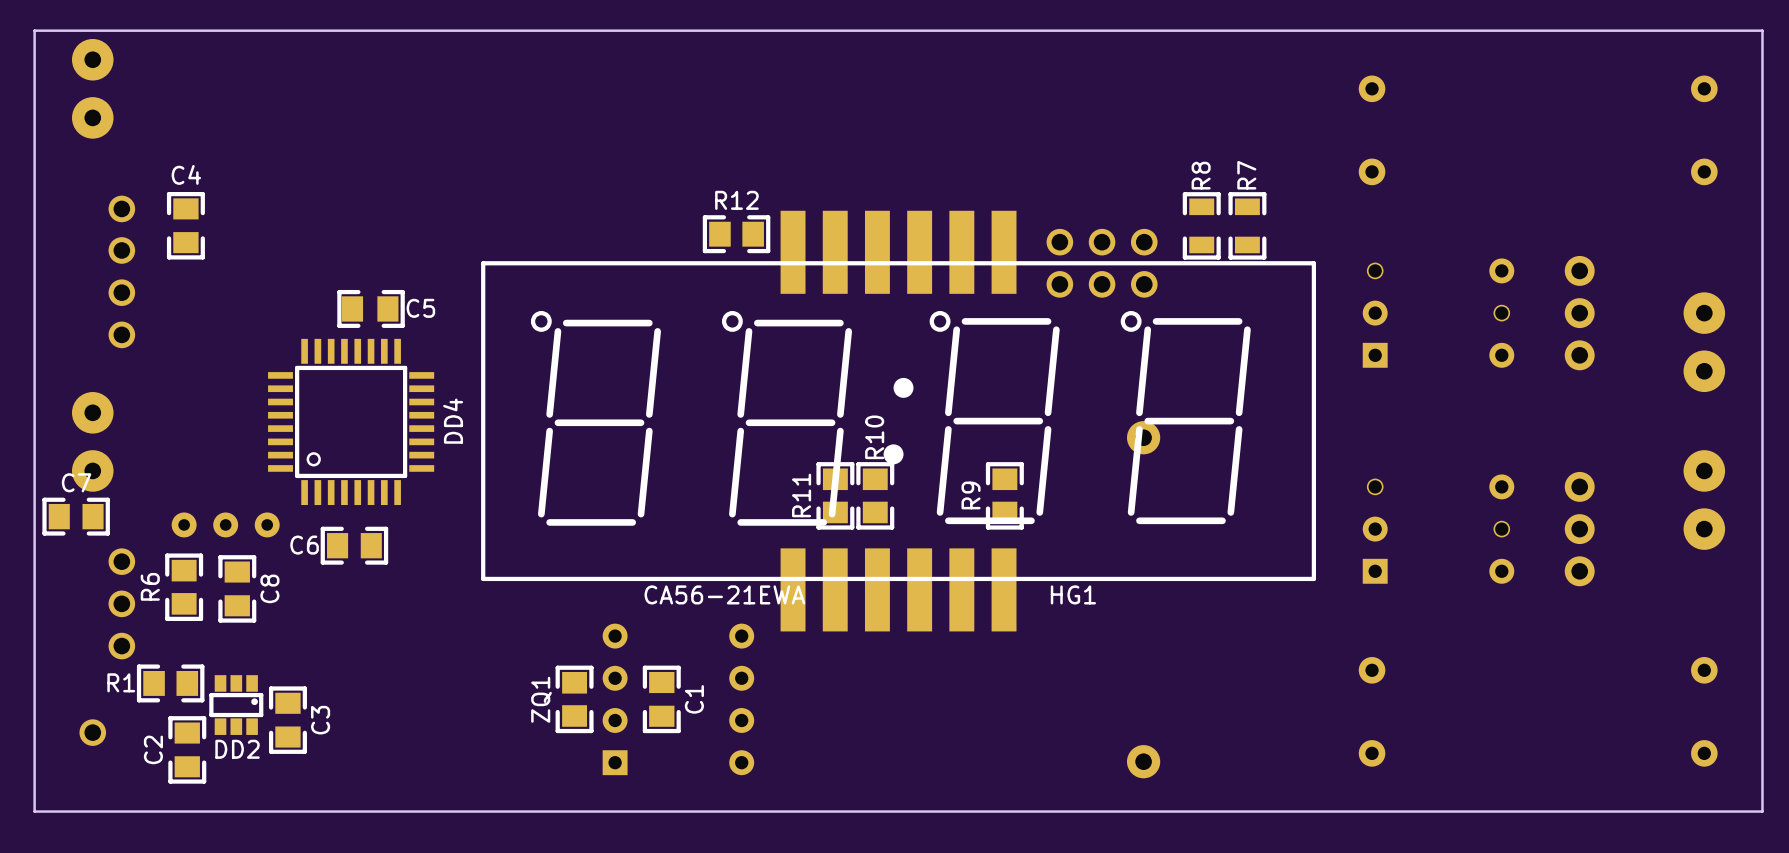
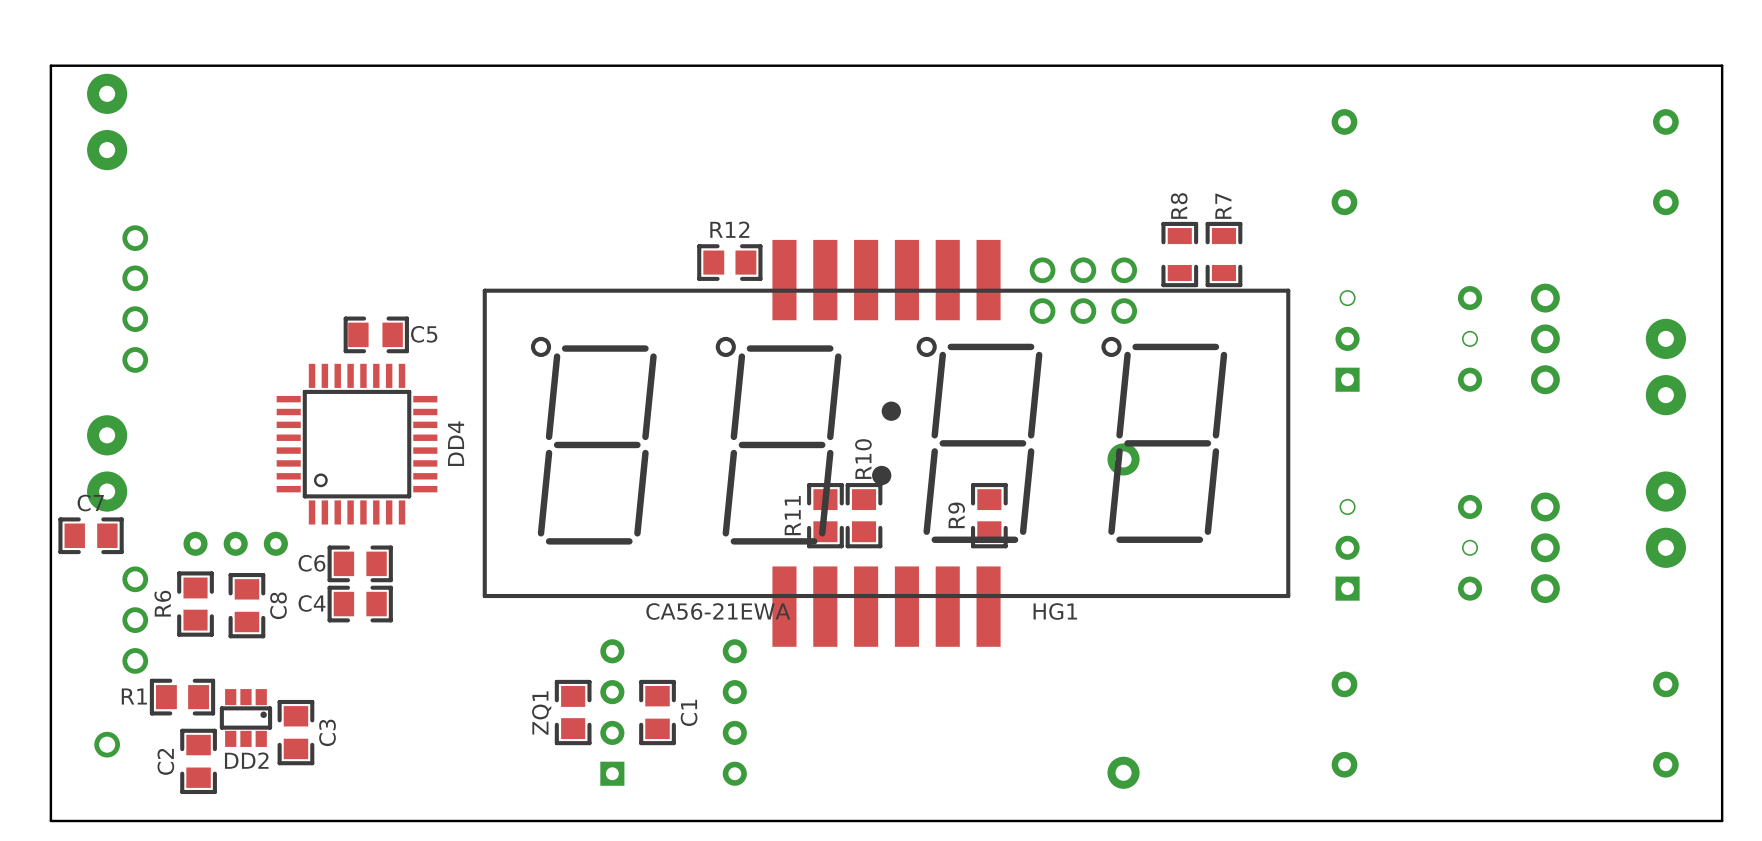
C4 name position: C4 (186, 174) -> C4 (312, 603)
C4 rotation: 0° (185, 225) -> 90° clockwise (360, 604)
C4 position: (185, 225) -> (360, 604)

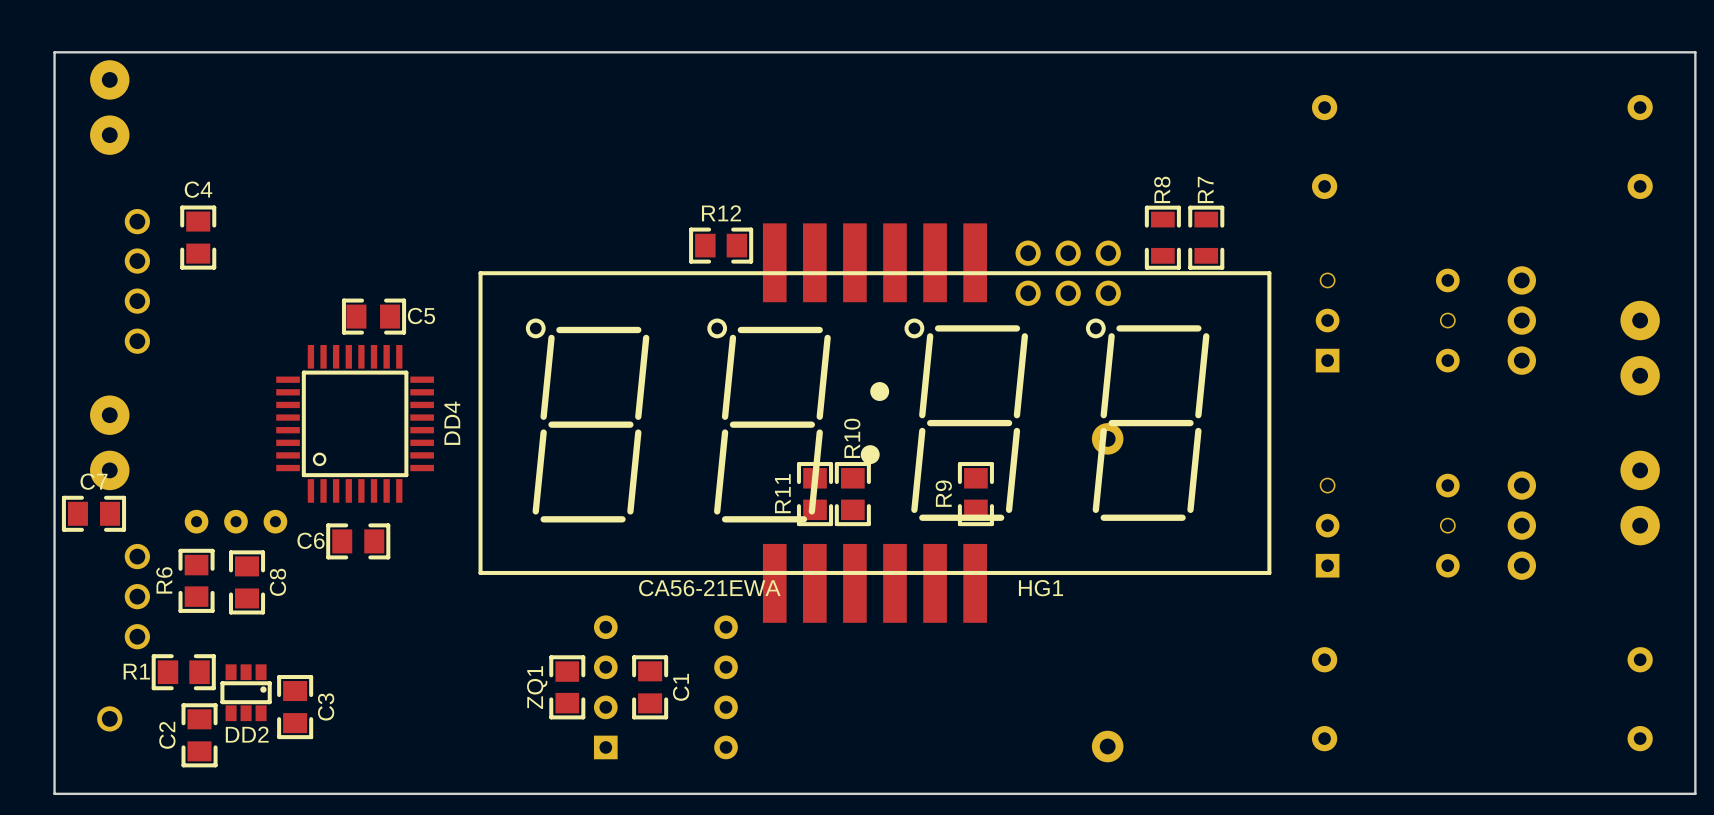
C4 rotation: 0° (360, 604) -> 90° clockwise (198, 237)
C4 position: (360, 604) -> (198, 237)

